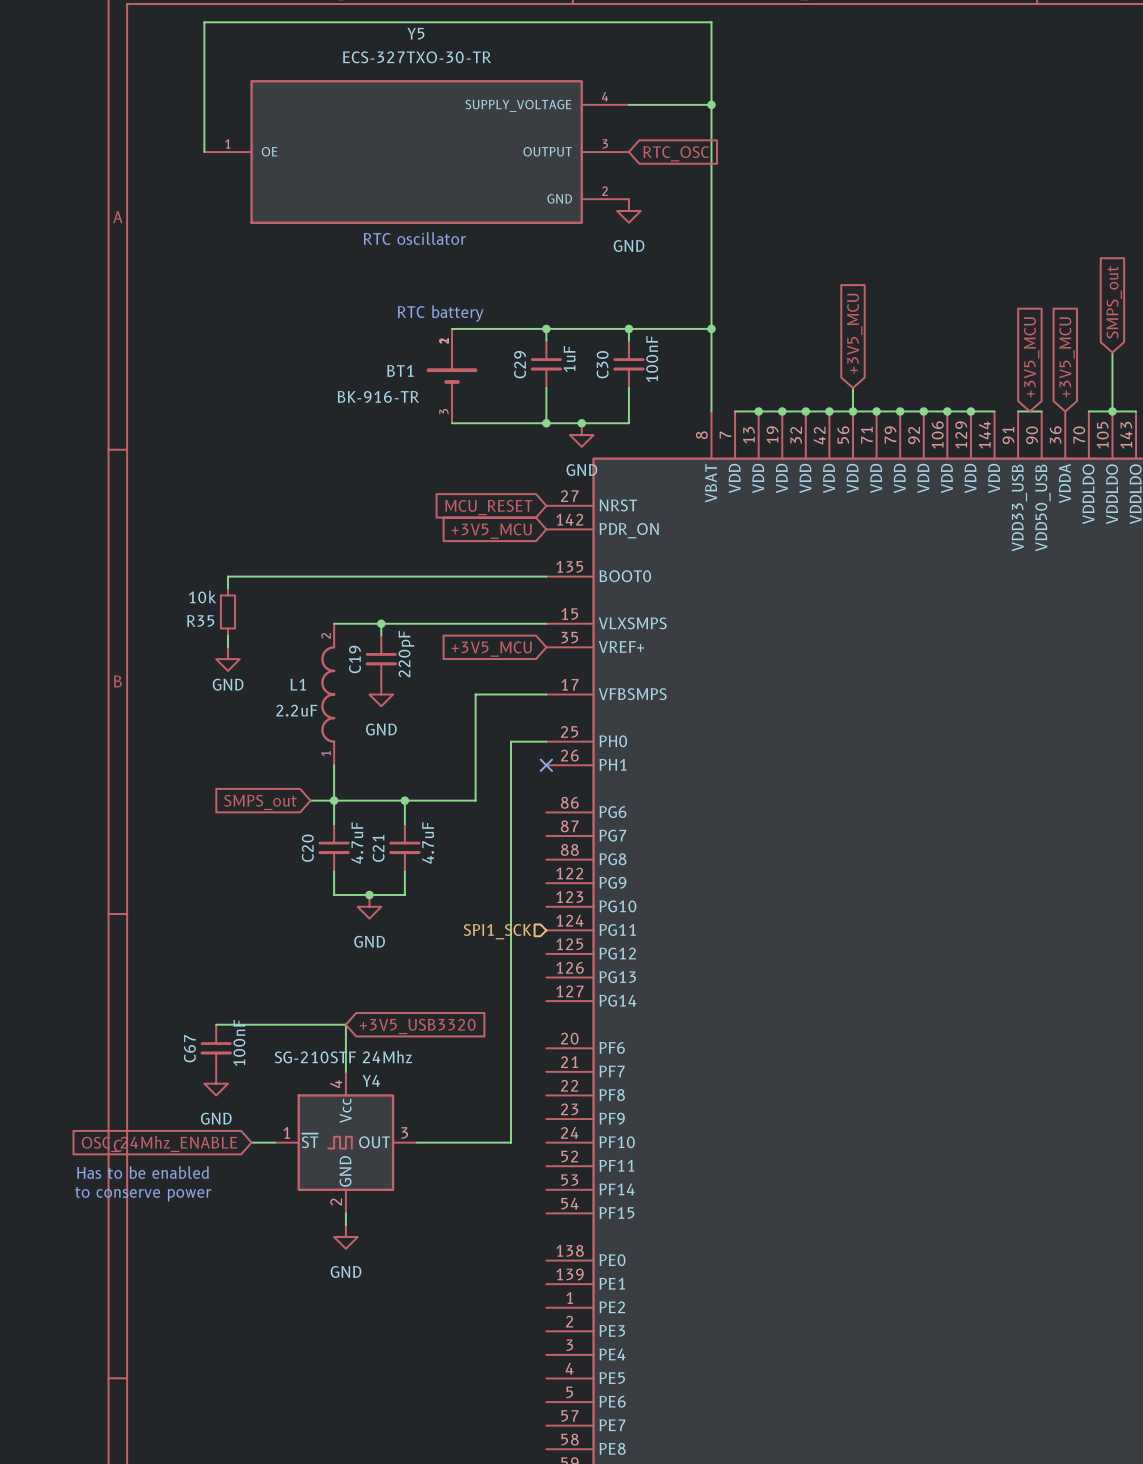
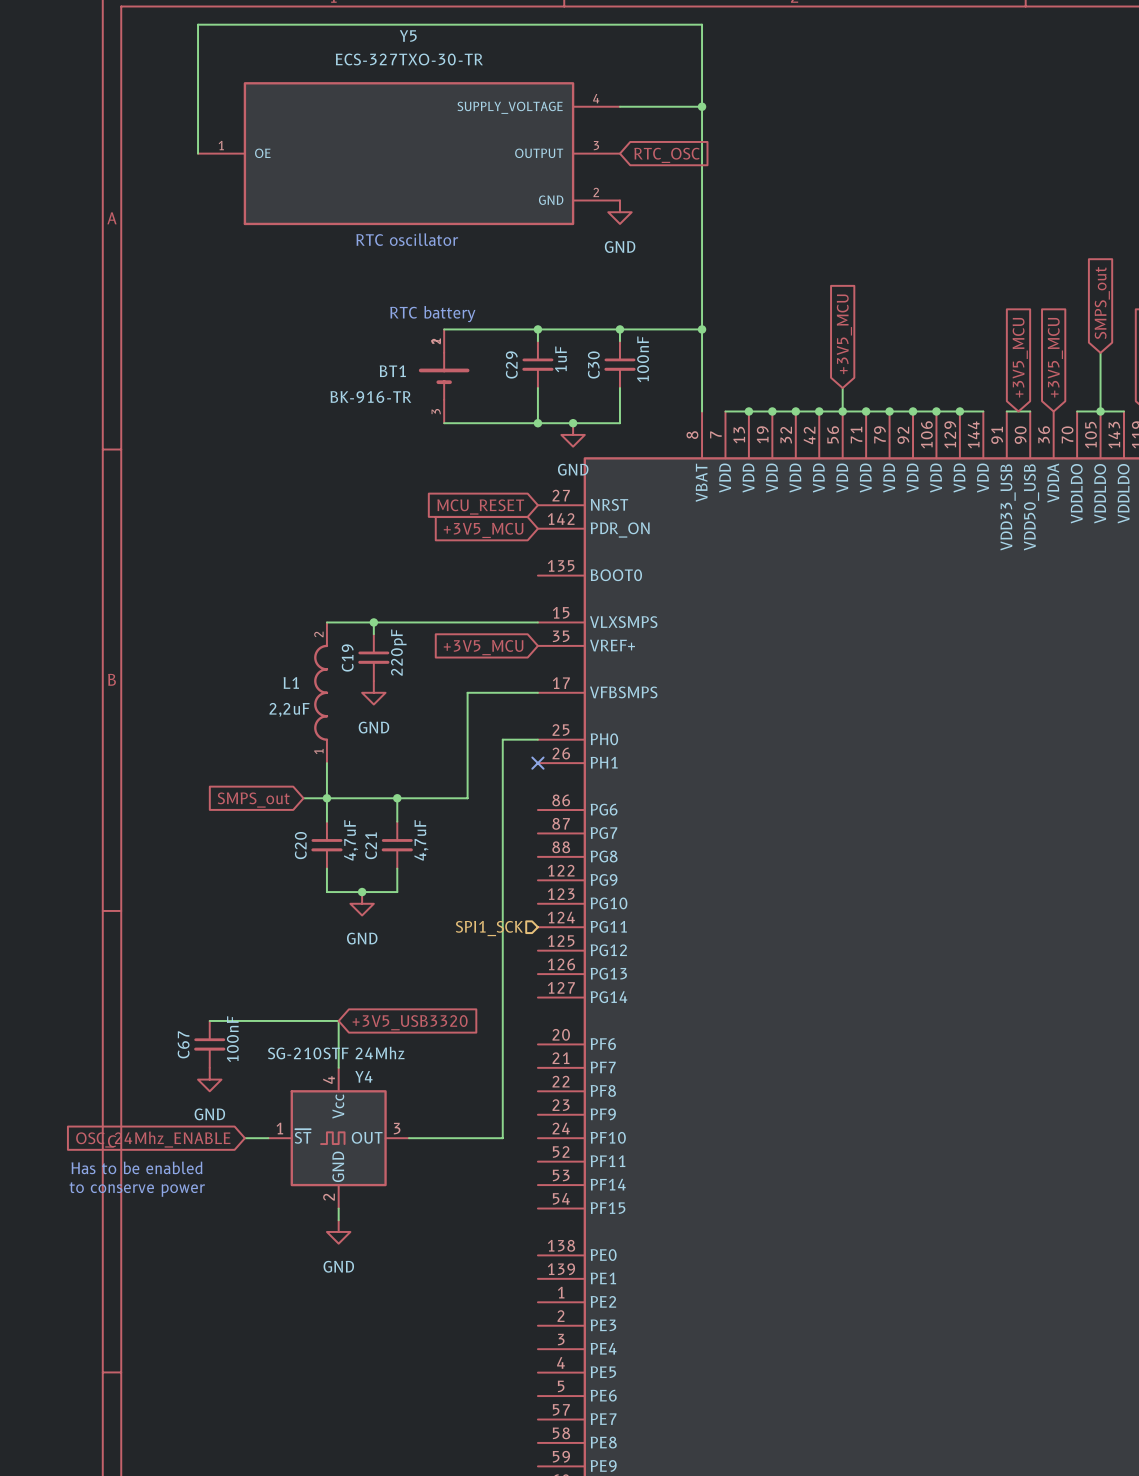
wire: (546, 576) (227, 576) (227, 588) -> none
R35: 10k (227, 611) -> none
wire: (227, 635) (227, 647) -> none
power symbol: GND (227, 659) -> none
L1 value: 2.2uF (296, 710) -> 2,2uF (289, 709)
C20 value: 4.7uF (357, 842) -> 4,7uF (351, 840)
C21 value: 4.7uF (428, 842) -> 4,7uF (421, 840)

